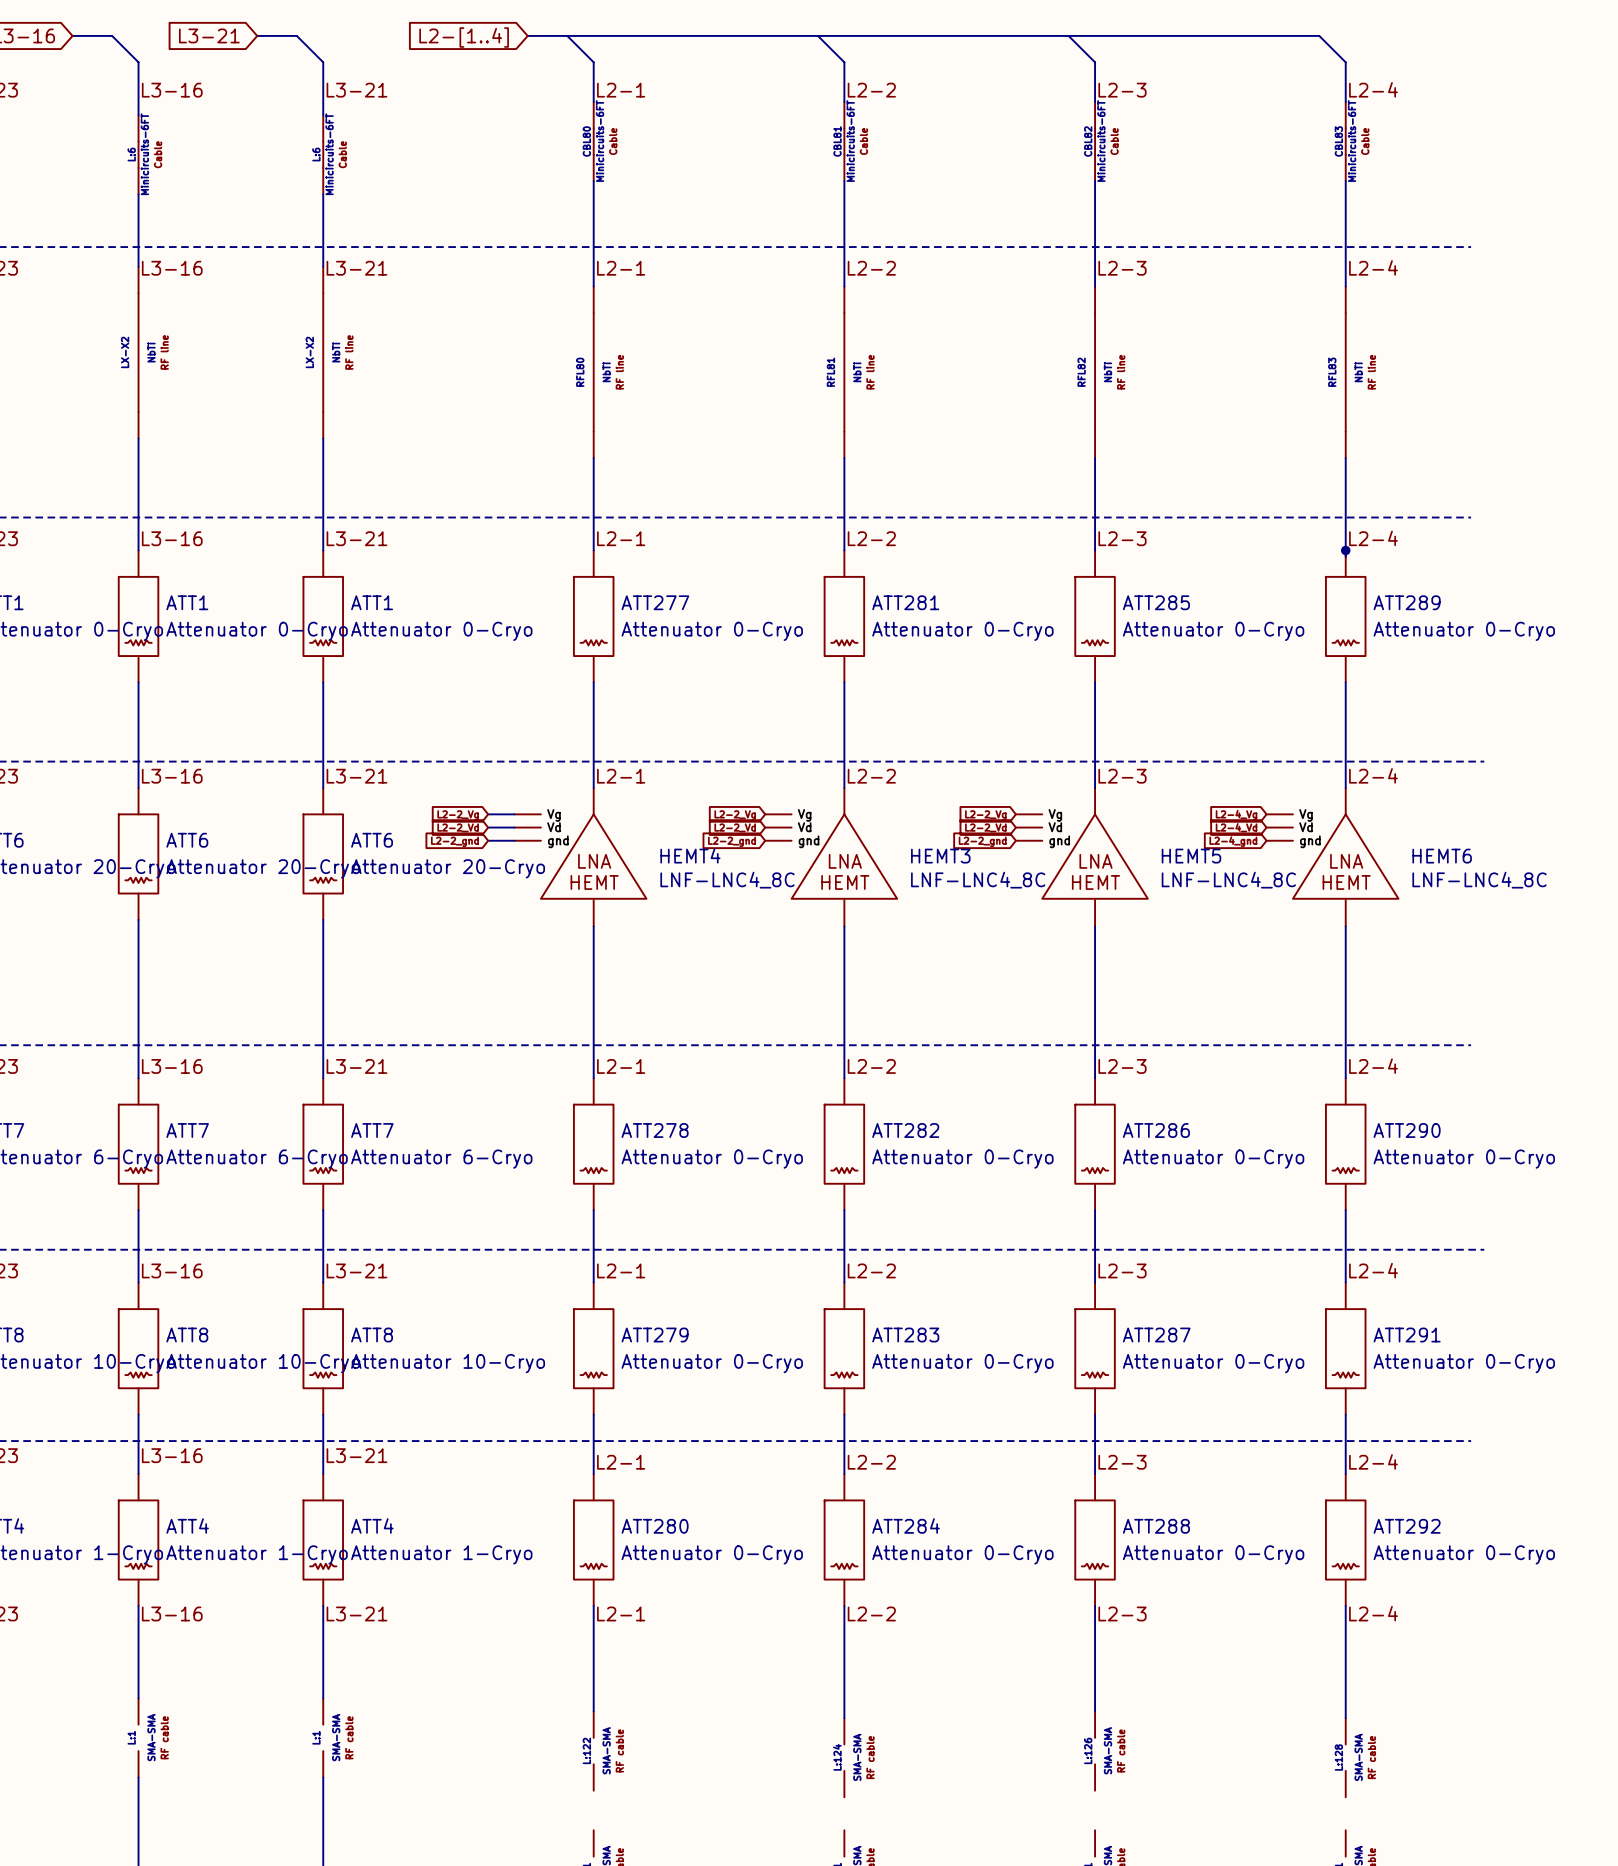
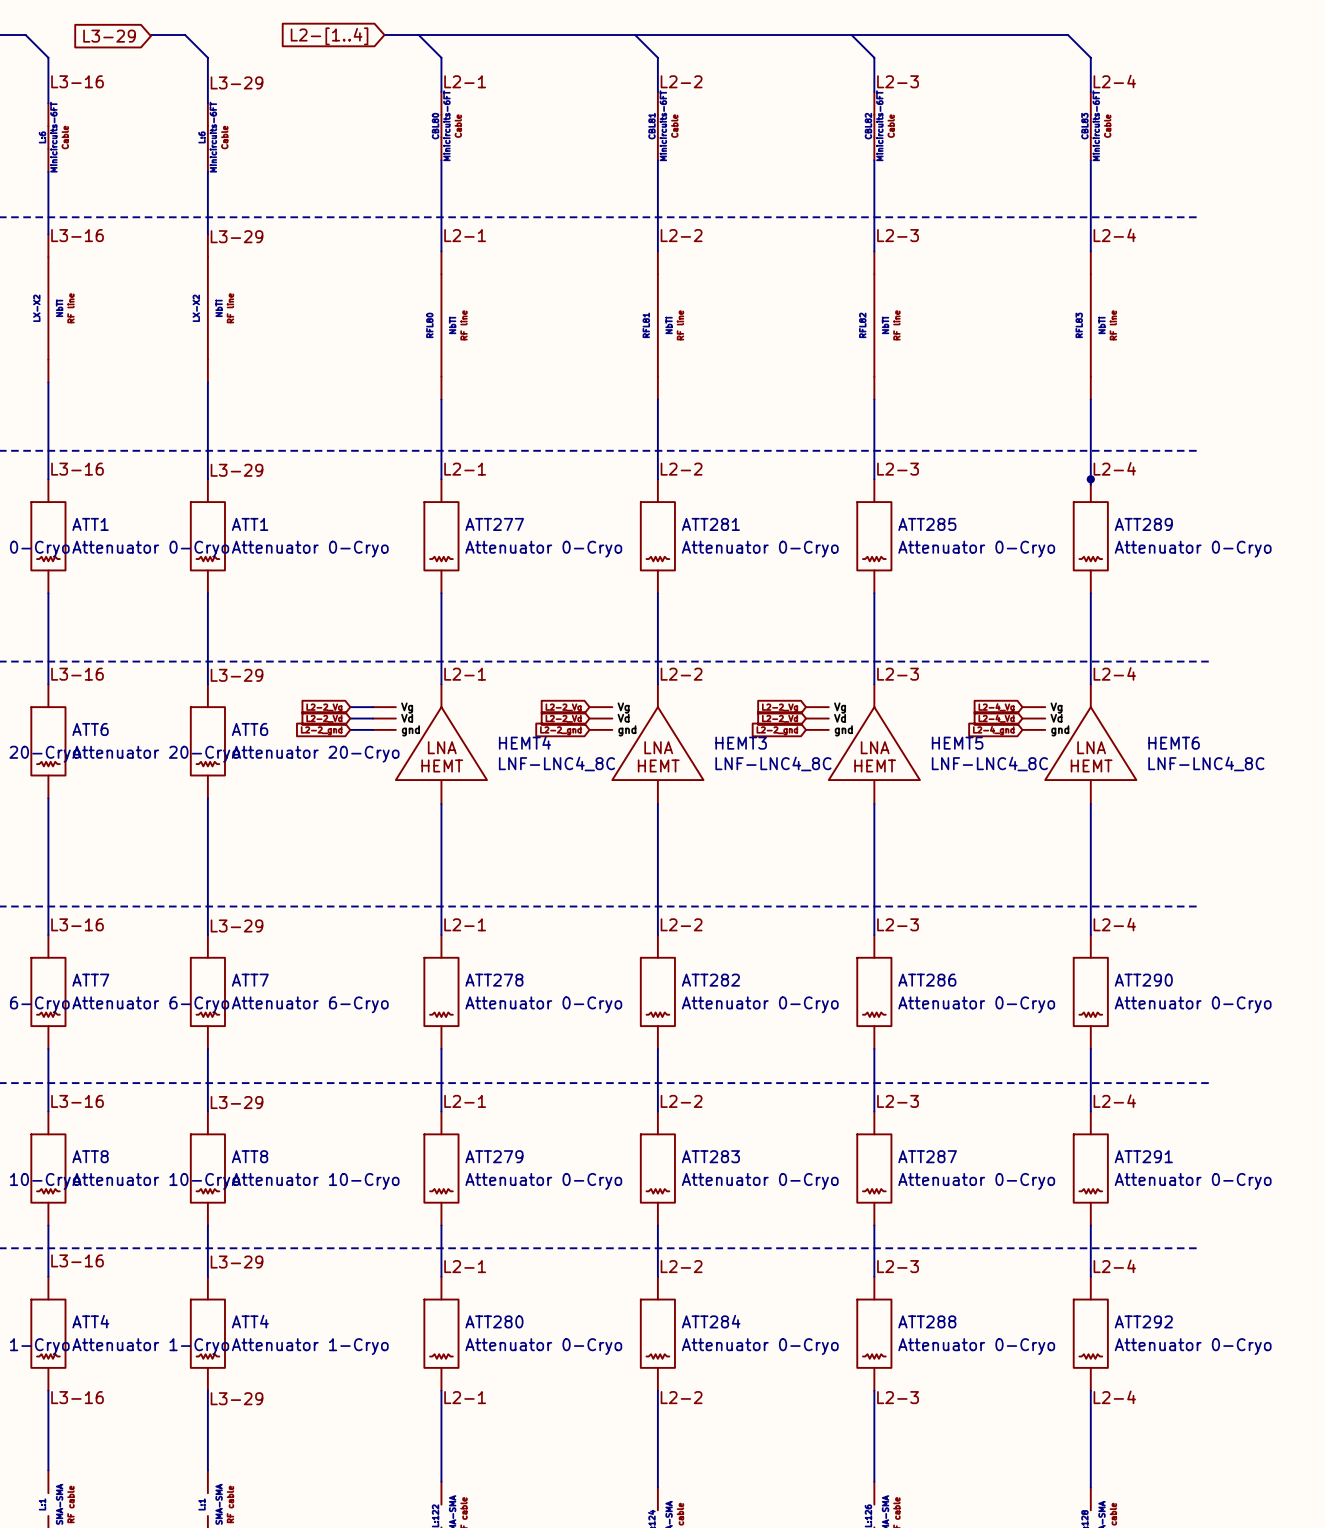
global label: L3-21 (209, 35) -> L3-29 (109, 36)
label: L3-21 (356, 90) -> L3-29 (237, 82)
label: L3-21 (356, 268) -> L3-29 (237, 236)
label: L3-21 (356, 538) -> L3-29 (237, 470)
label: L3-21 (356, 776) -> L3-29 (237, 675)
label: L3-21 (356, 1066) -> L3-29 (237, 925)
label: L3-21 (356, 1270) -> L3-29 (237, 1102)
label: L3-21 (356, 1455) -> L3-29 (237, 1262)
label: L3-21 (356, 1613) -> L3-29 (237, 1398)

